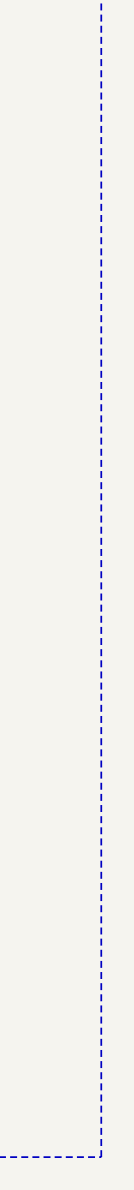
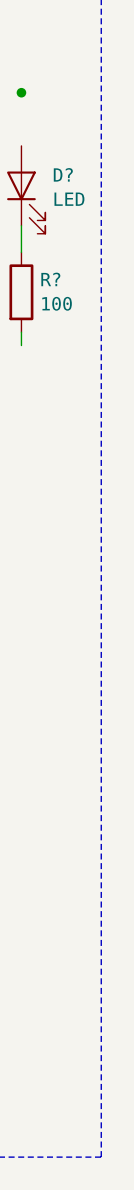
junction: none -> (21, 92)
D?: none -> LED (26, 189)
wire: none -> (21, 225) (21, 252)
R?: none -> 100 (21, 292)
wire: none -> (21, 332) (21, 345)

